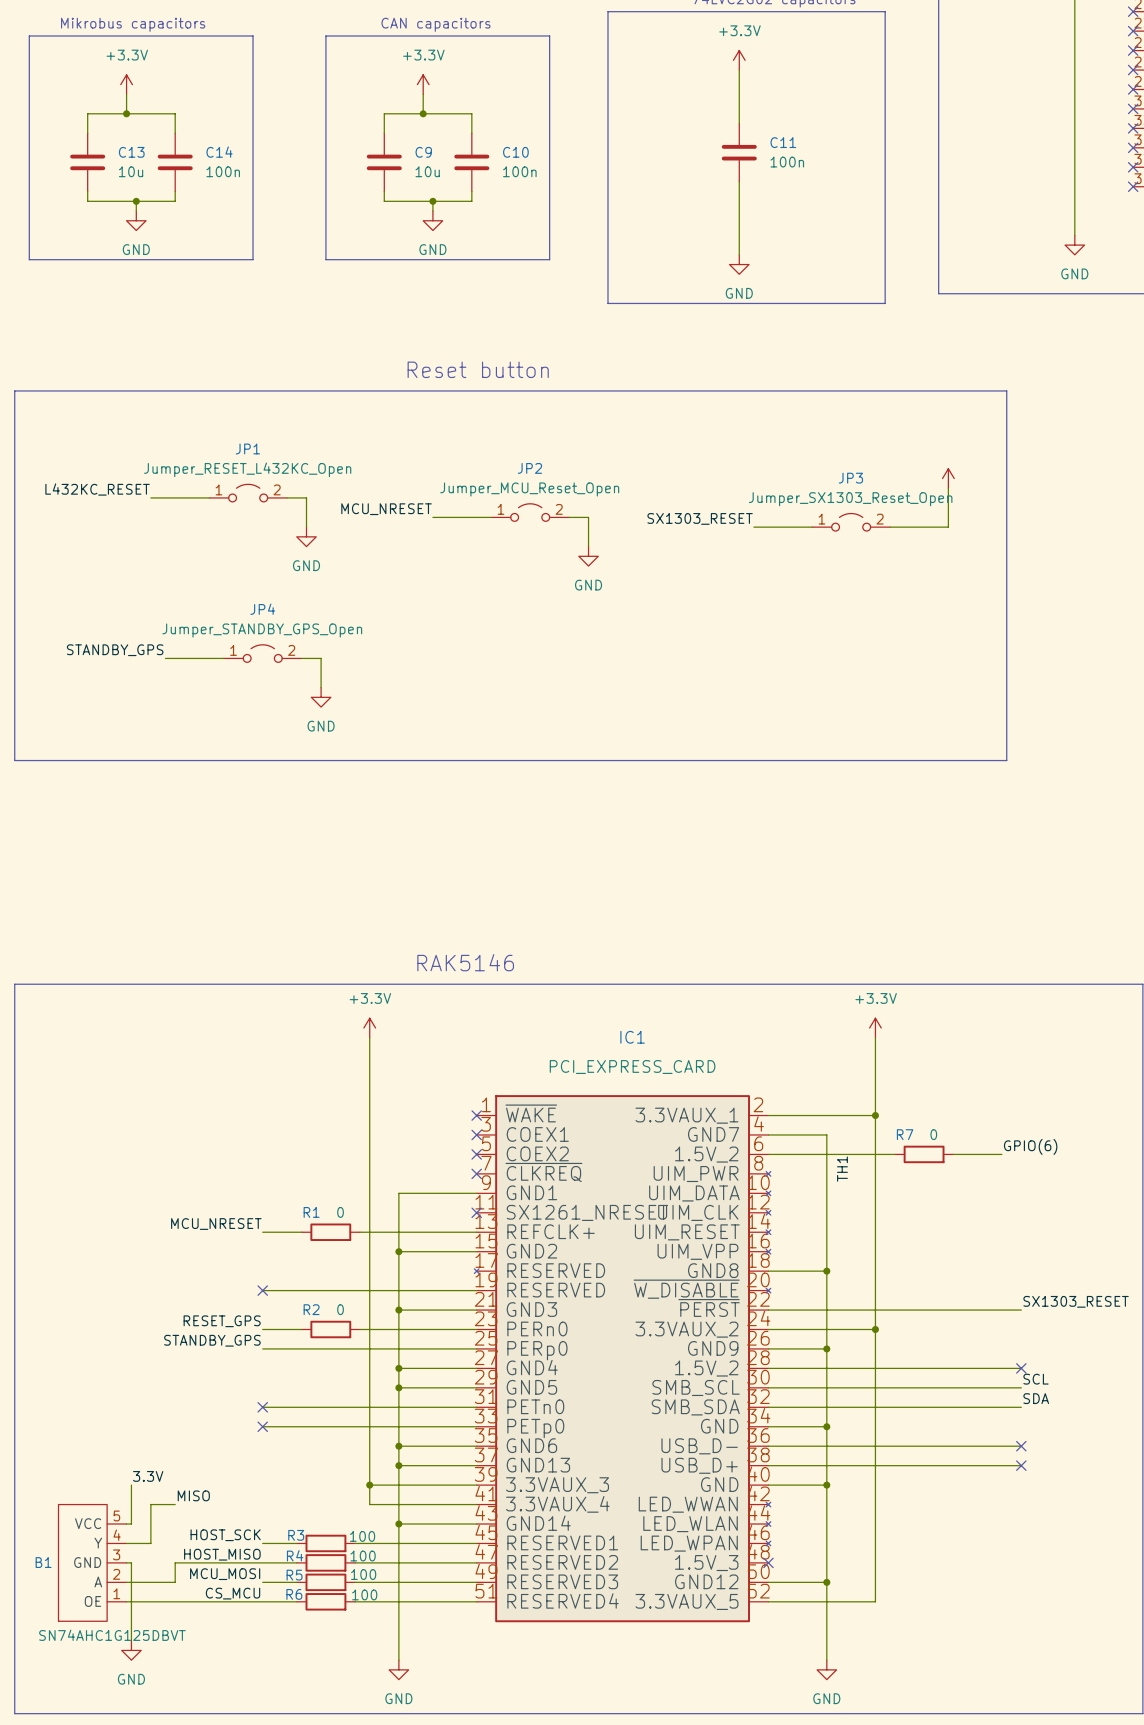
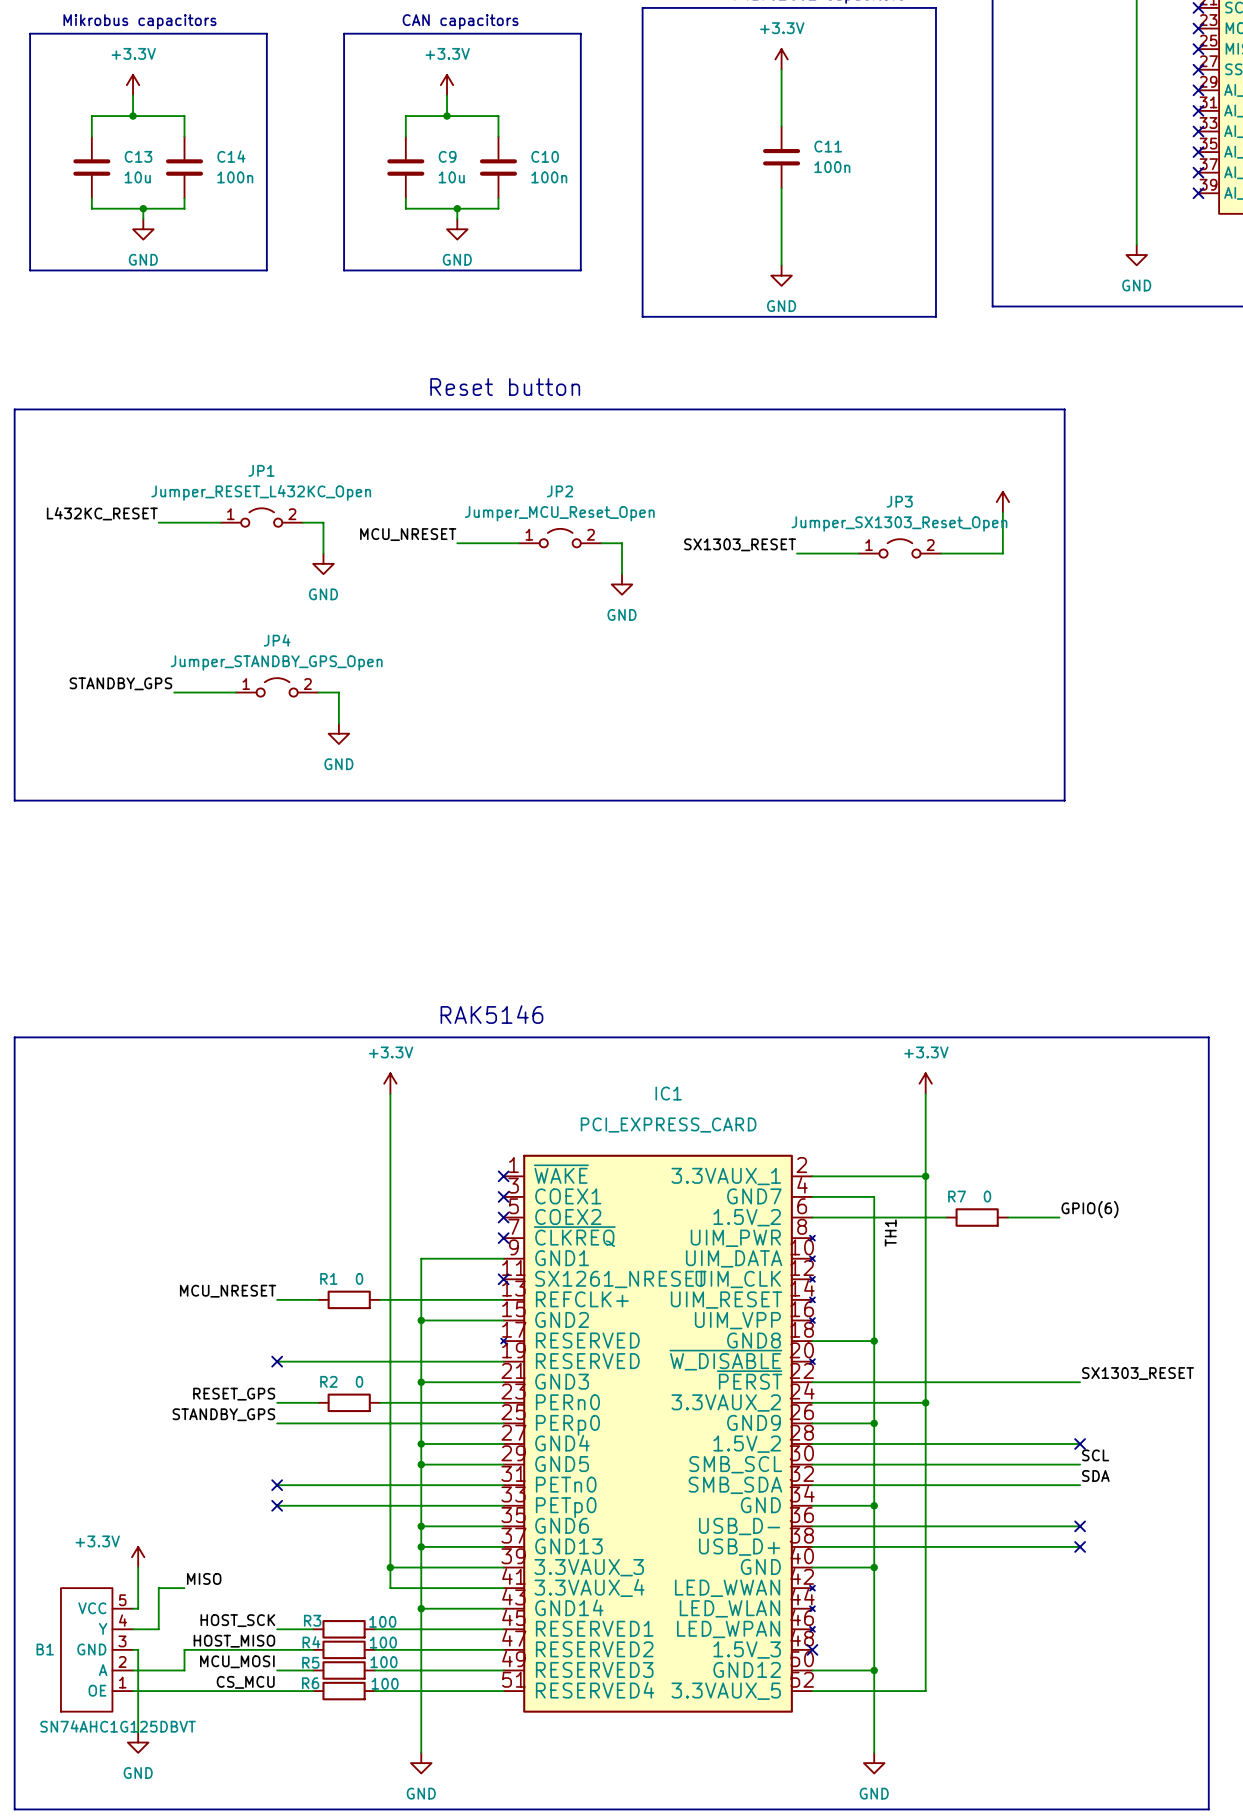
power symbol: none -> +3.3V (138, 1557)
label: 3.3V (148, 1476) -> none

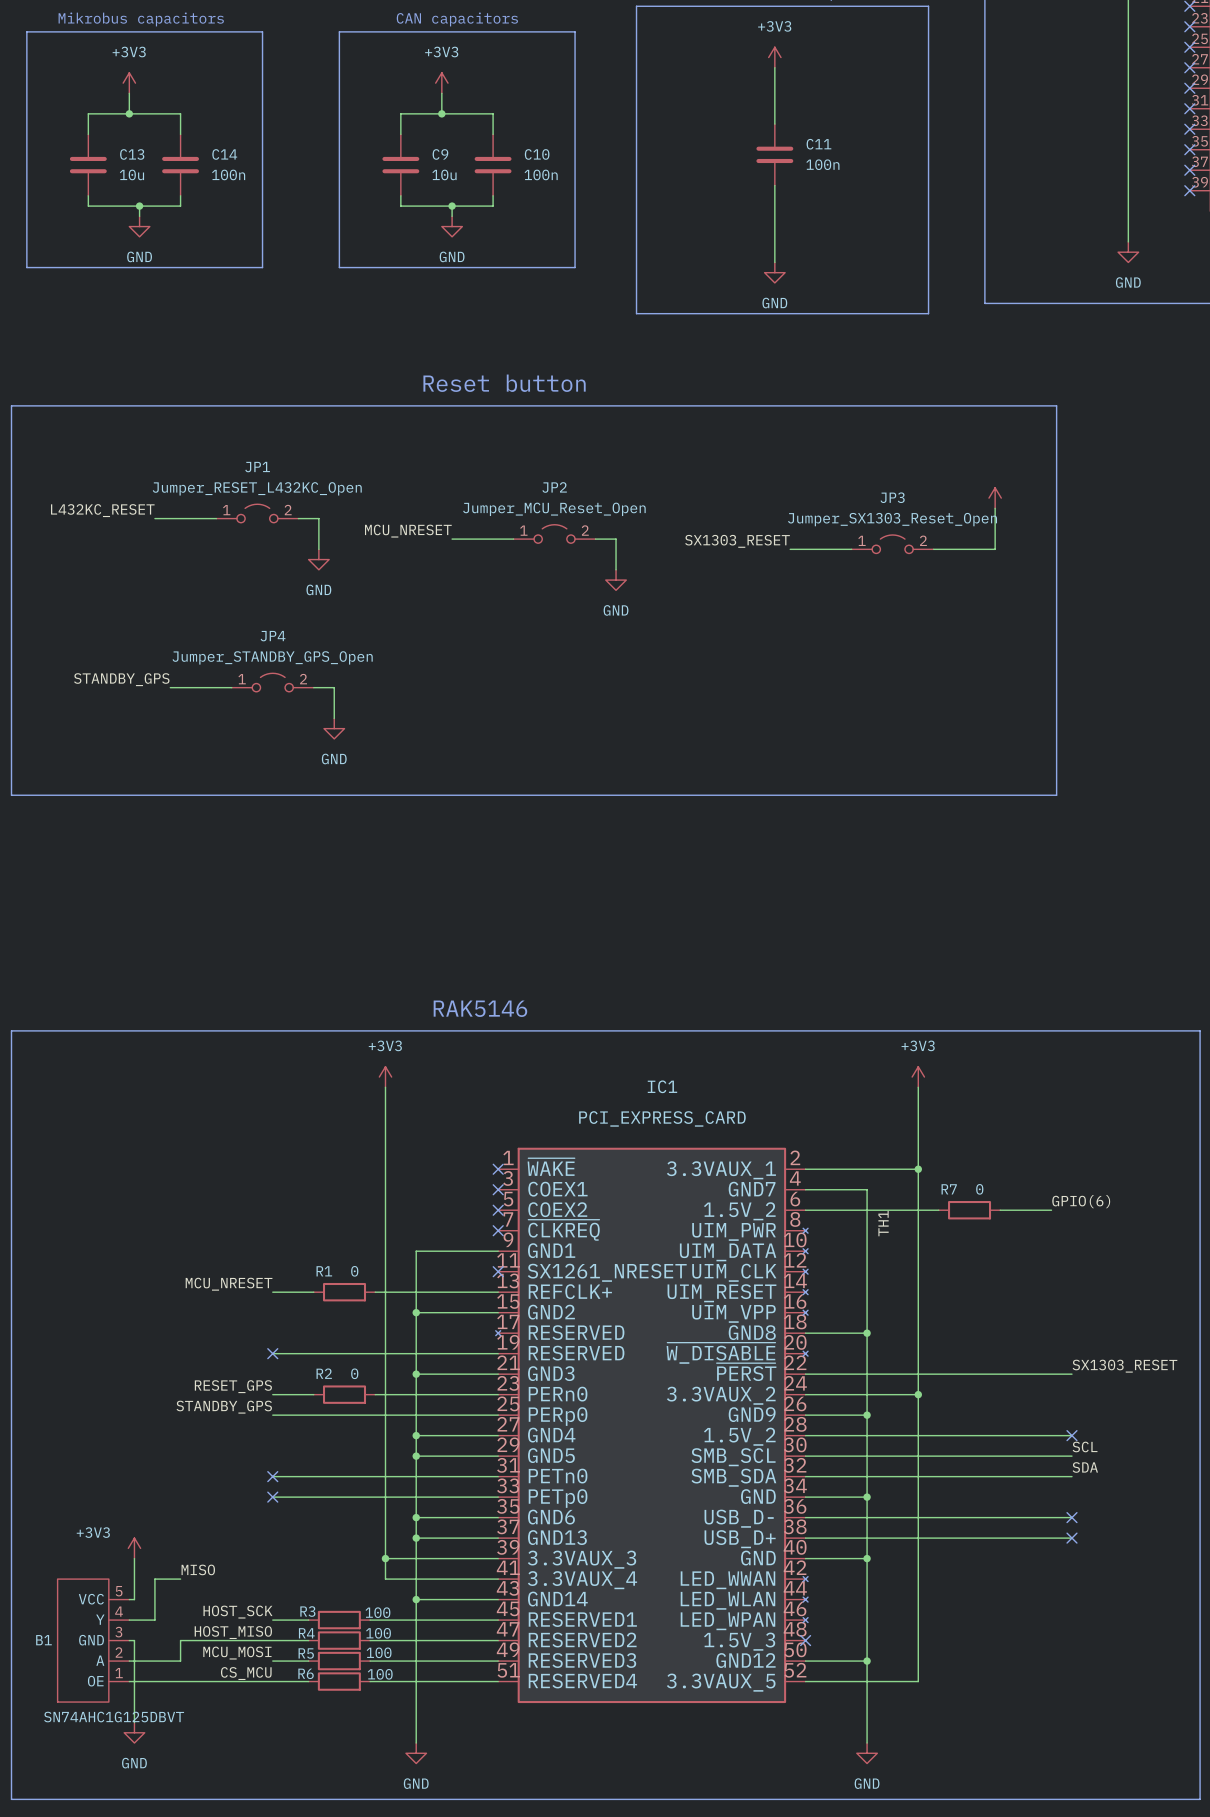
power symbol: +3.3V (781, 59) -> +3V3 (774, 57)
power symbol: +3.3V (133, 85) -> +3V3 (129, 83)
power symbol: +3.3V (447, 85) -> +3V3 (441, 83)
power symbol: +3.3V (390, 1083) -> +3V3 (385, 1077)
power symbol: +3.3V (925, 1083) -> +3V3 (918, 1077)
power symbol: +3.3V (138, 1557) -> +3V3 (134, 1548)

